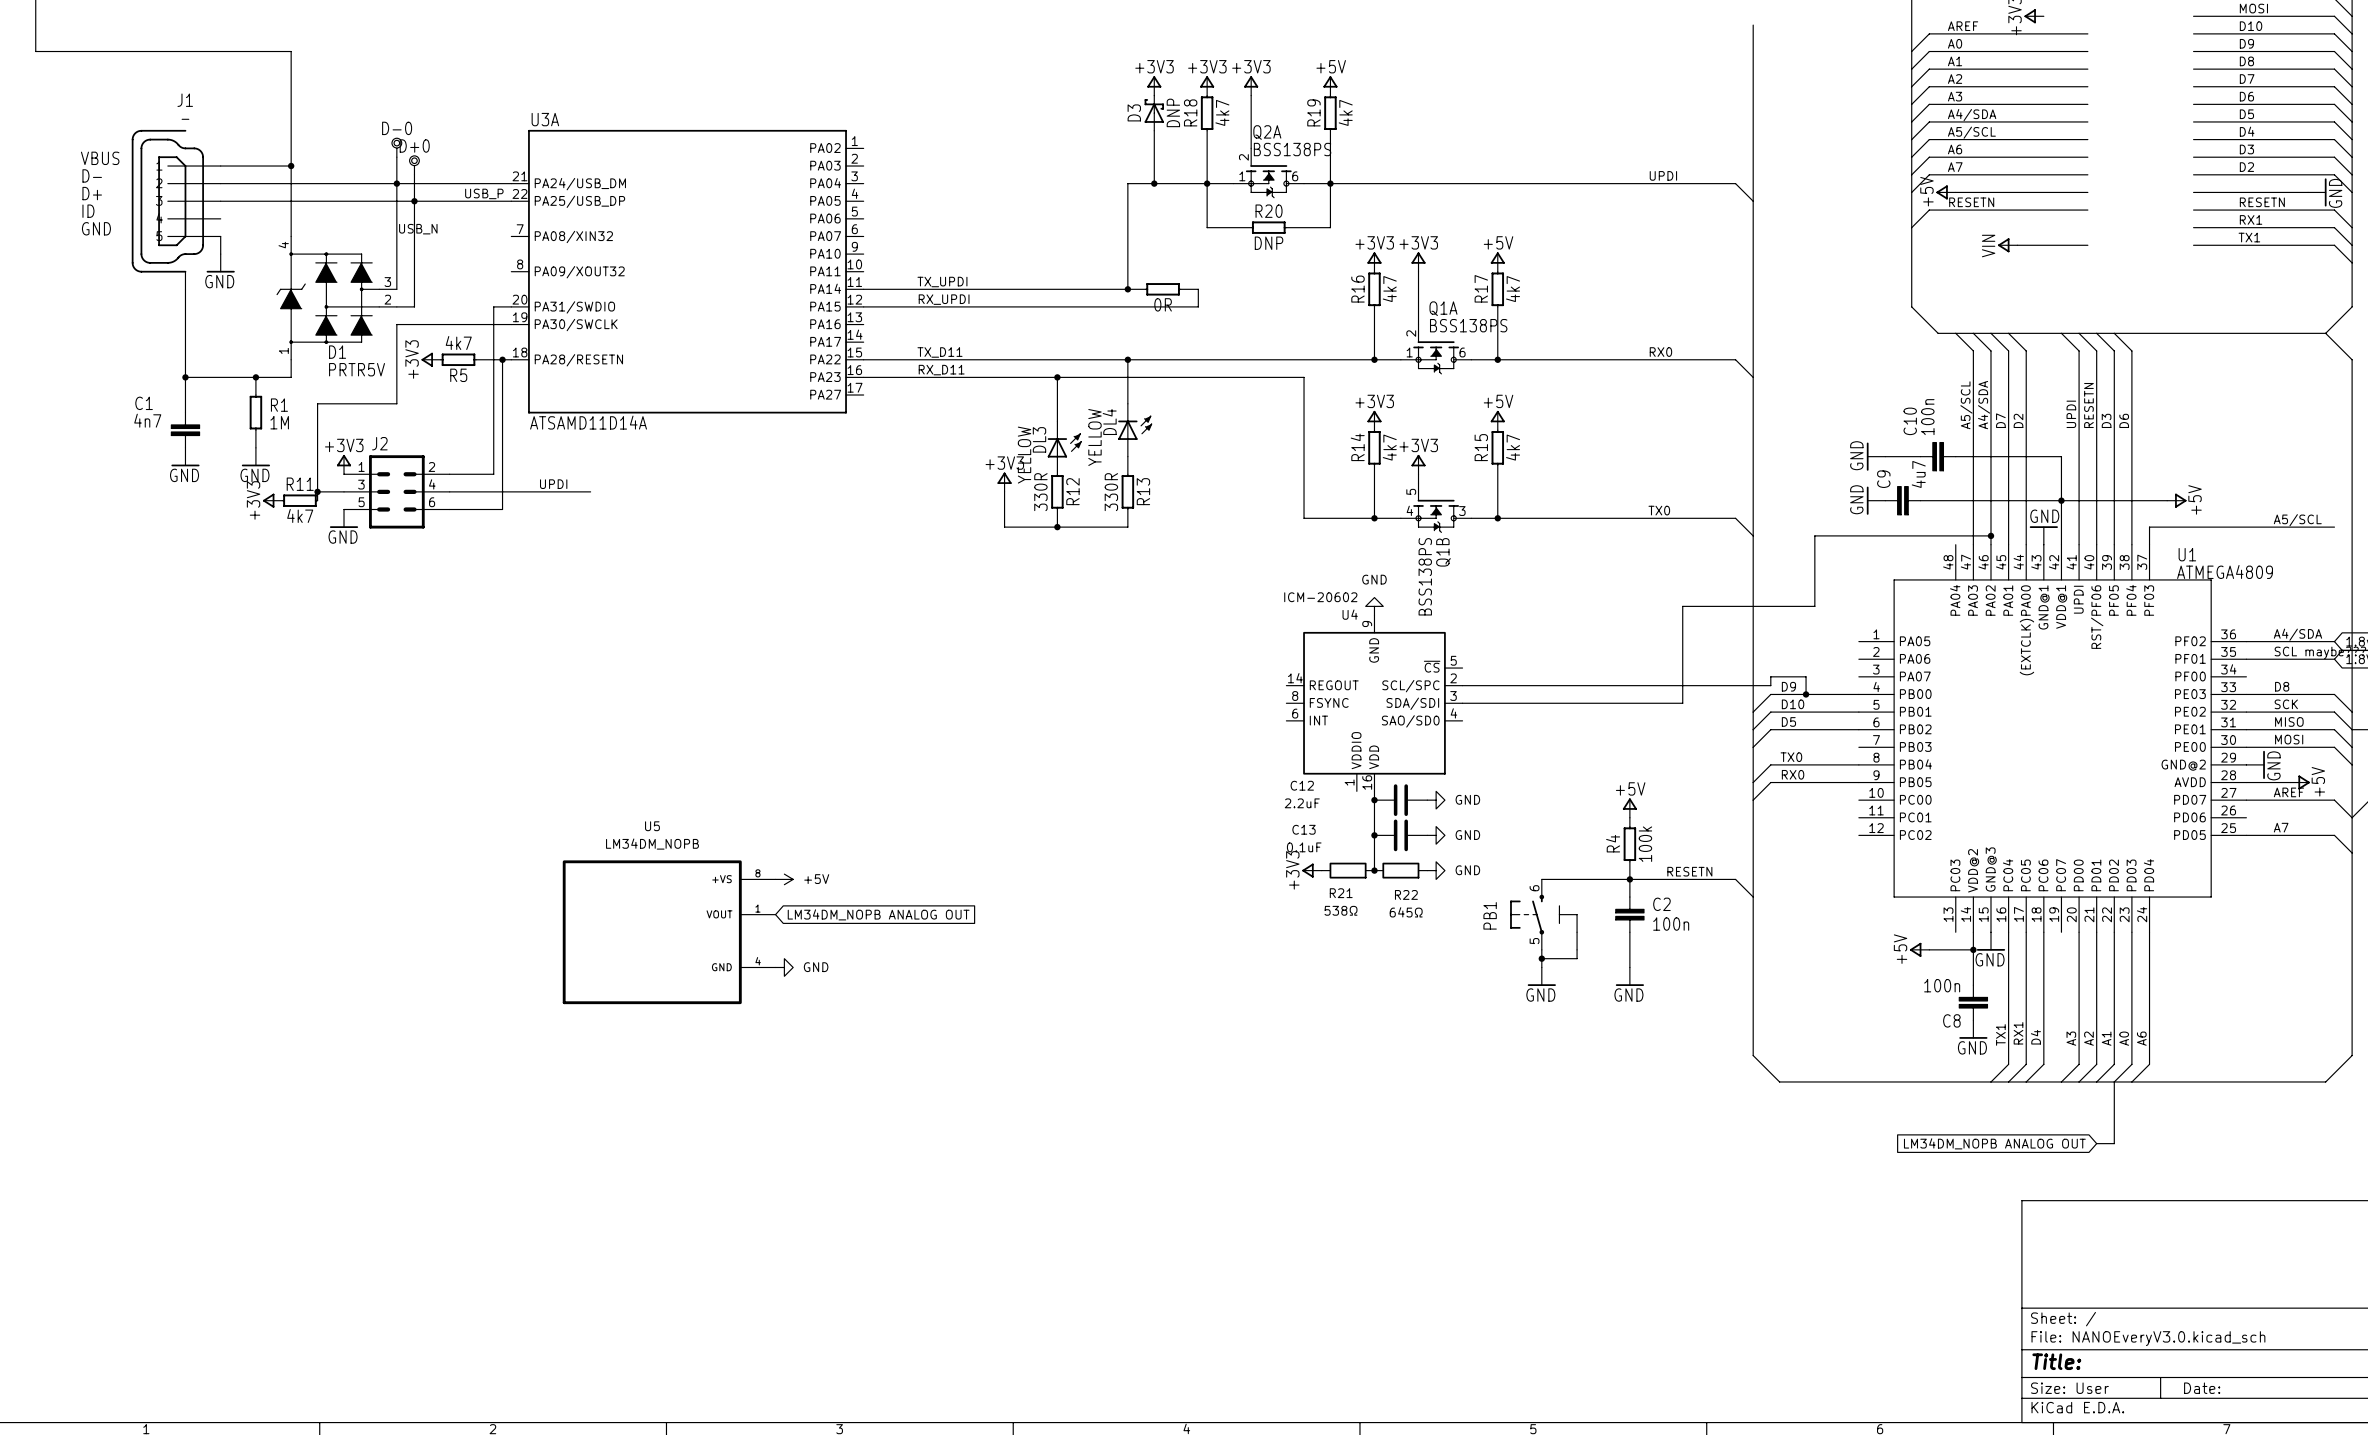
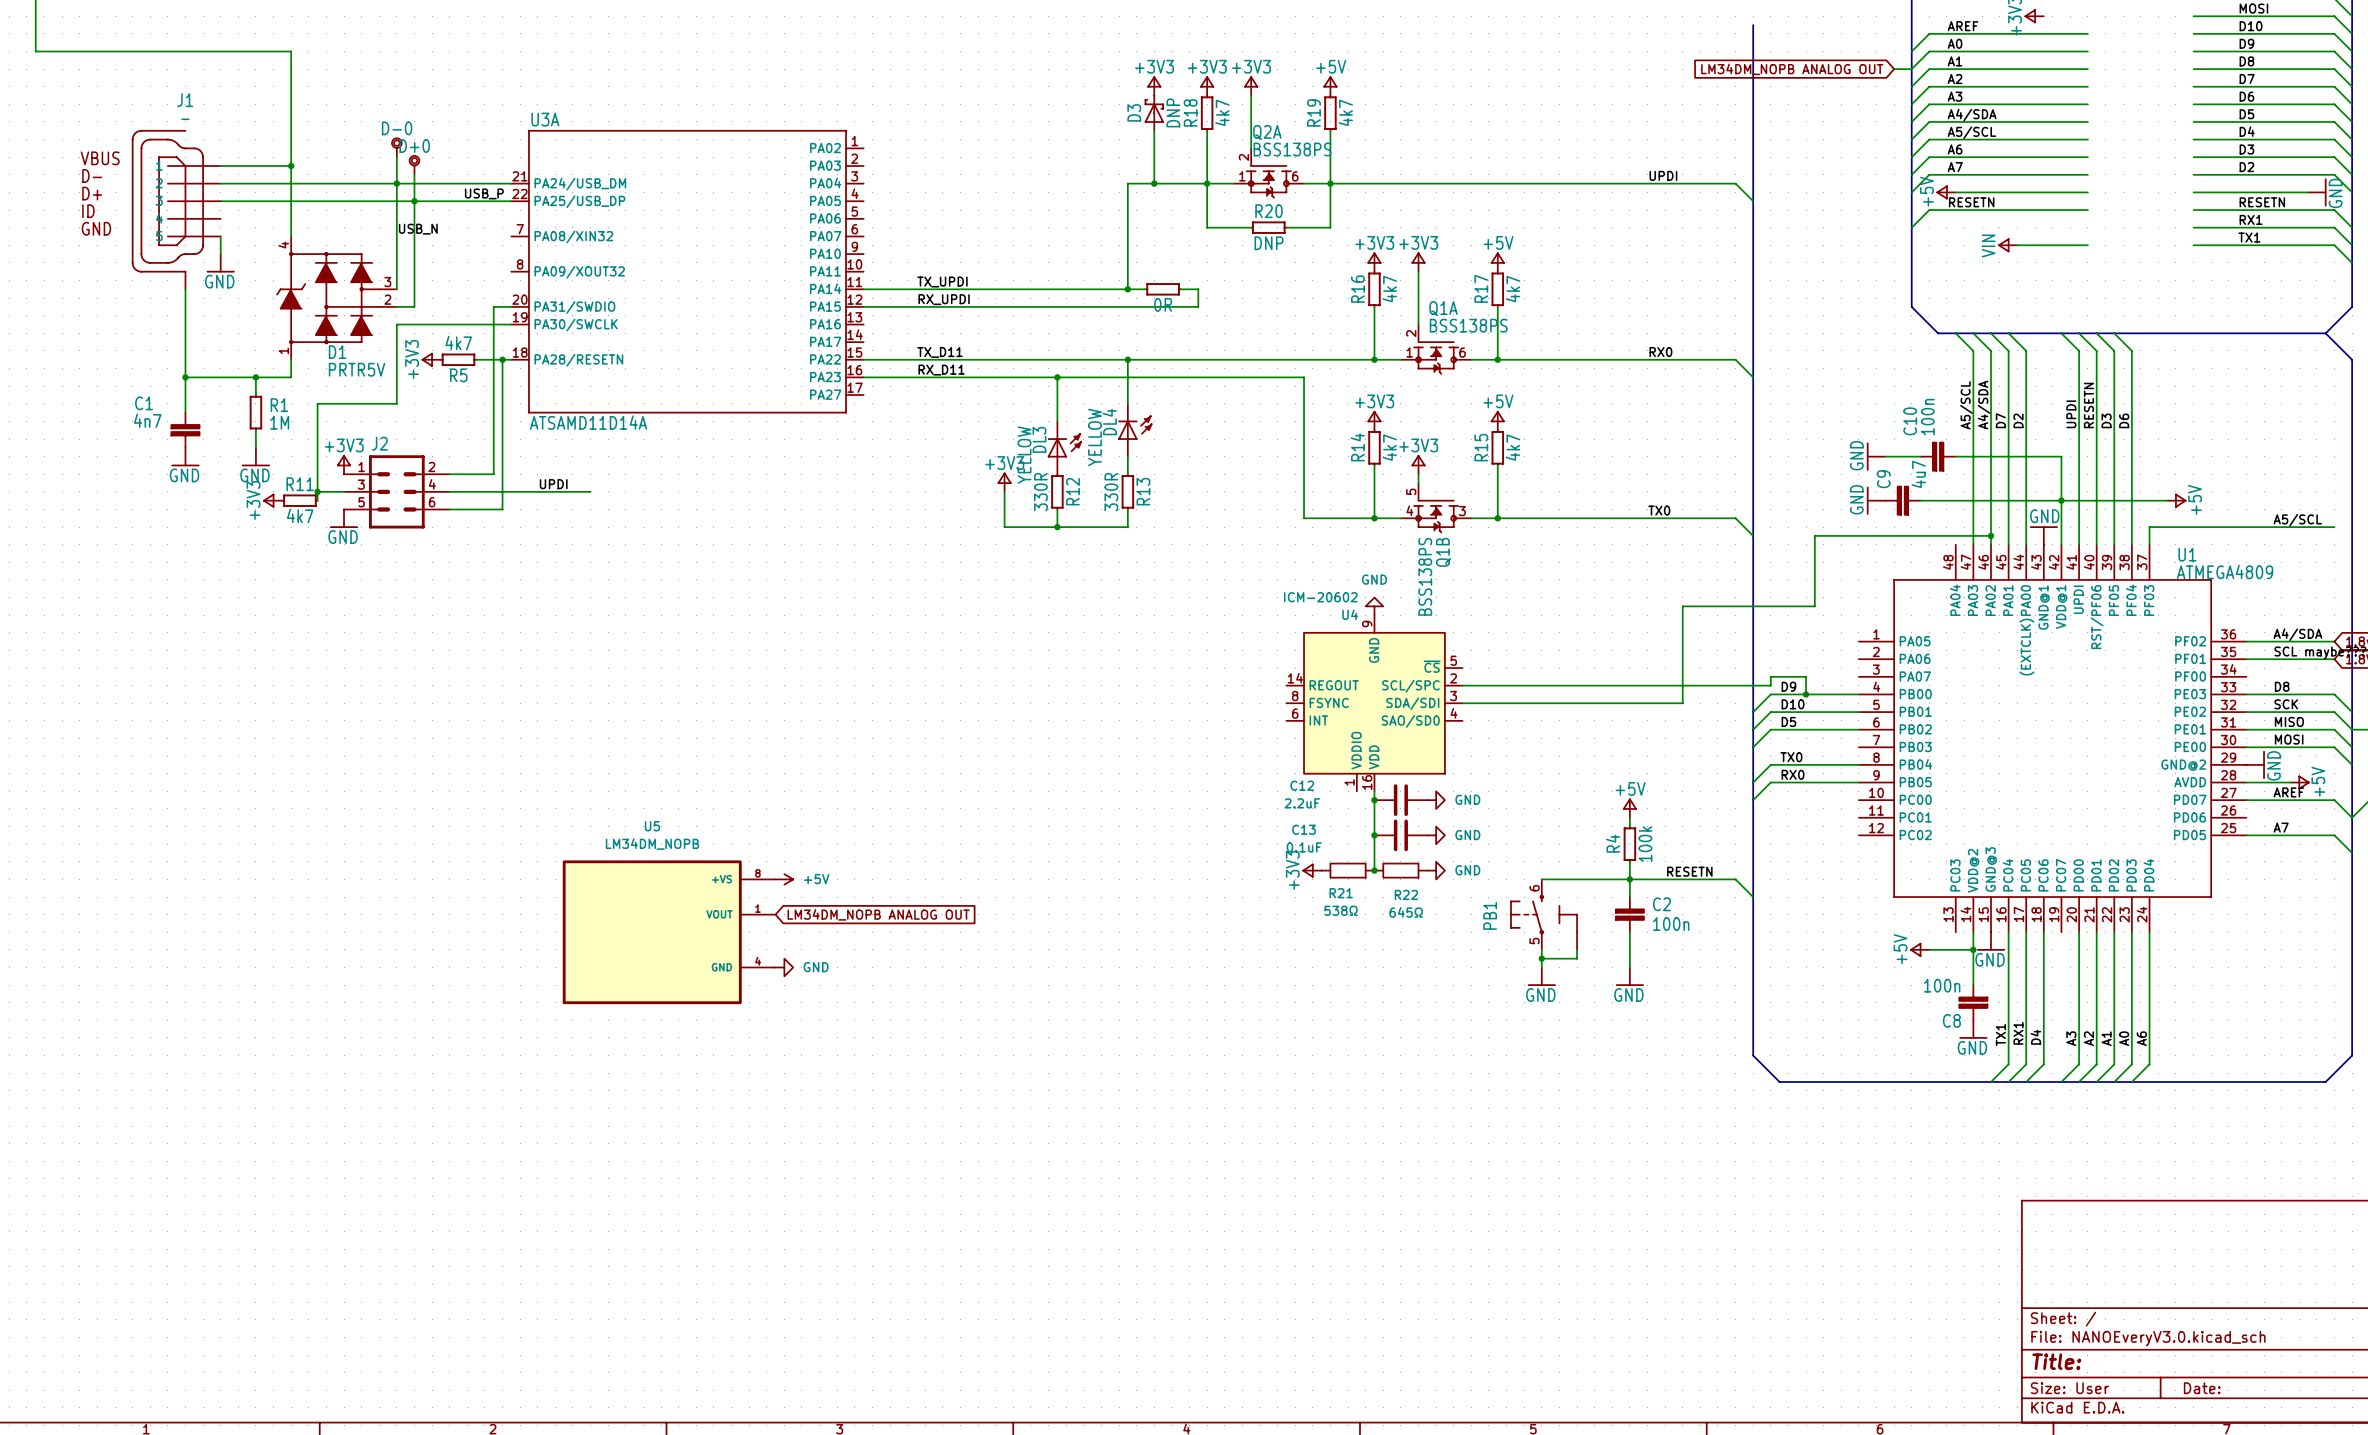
global label: none -> LM34DM_NOPB ANALOG OUT (1792, 69)
wire: none -> (1894, 69) (1911, 69)
wire: (2114, 1081) (2114, 1143) (2096, 1143) -> none
global label: LM34DM_NOPB ANALOG OUT (1994, 1143) -> none

